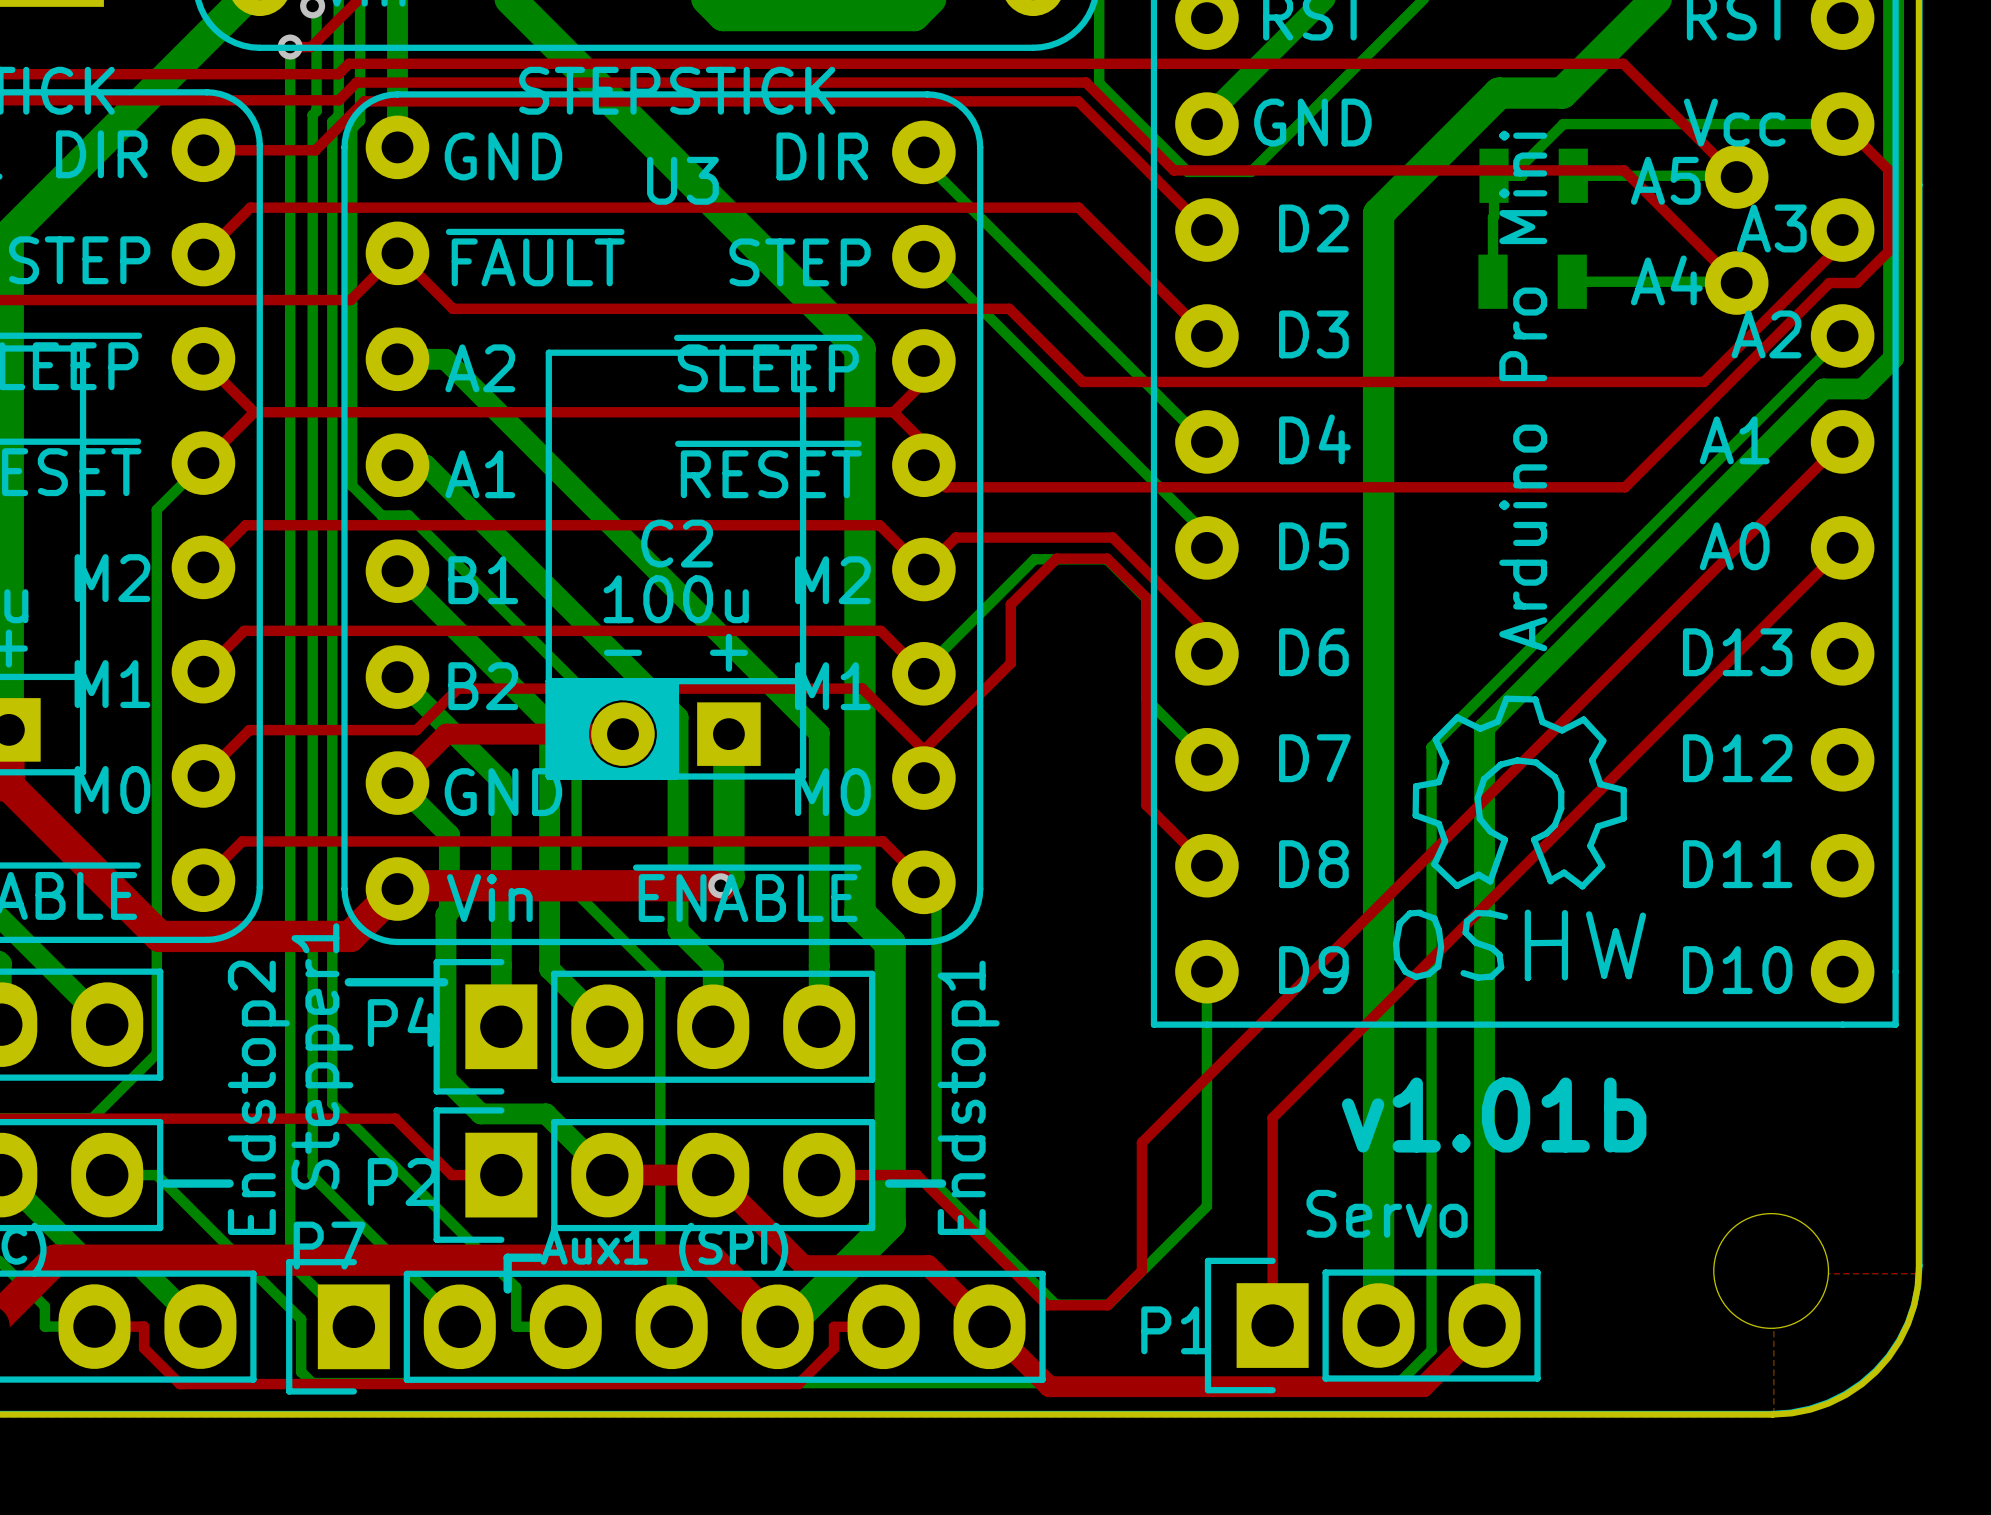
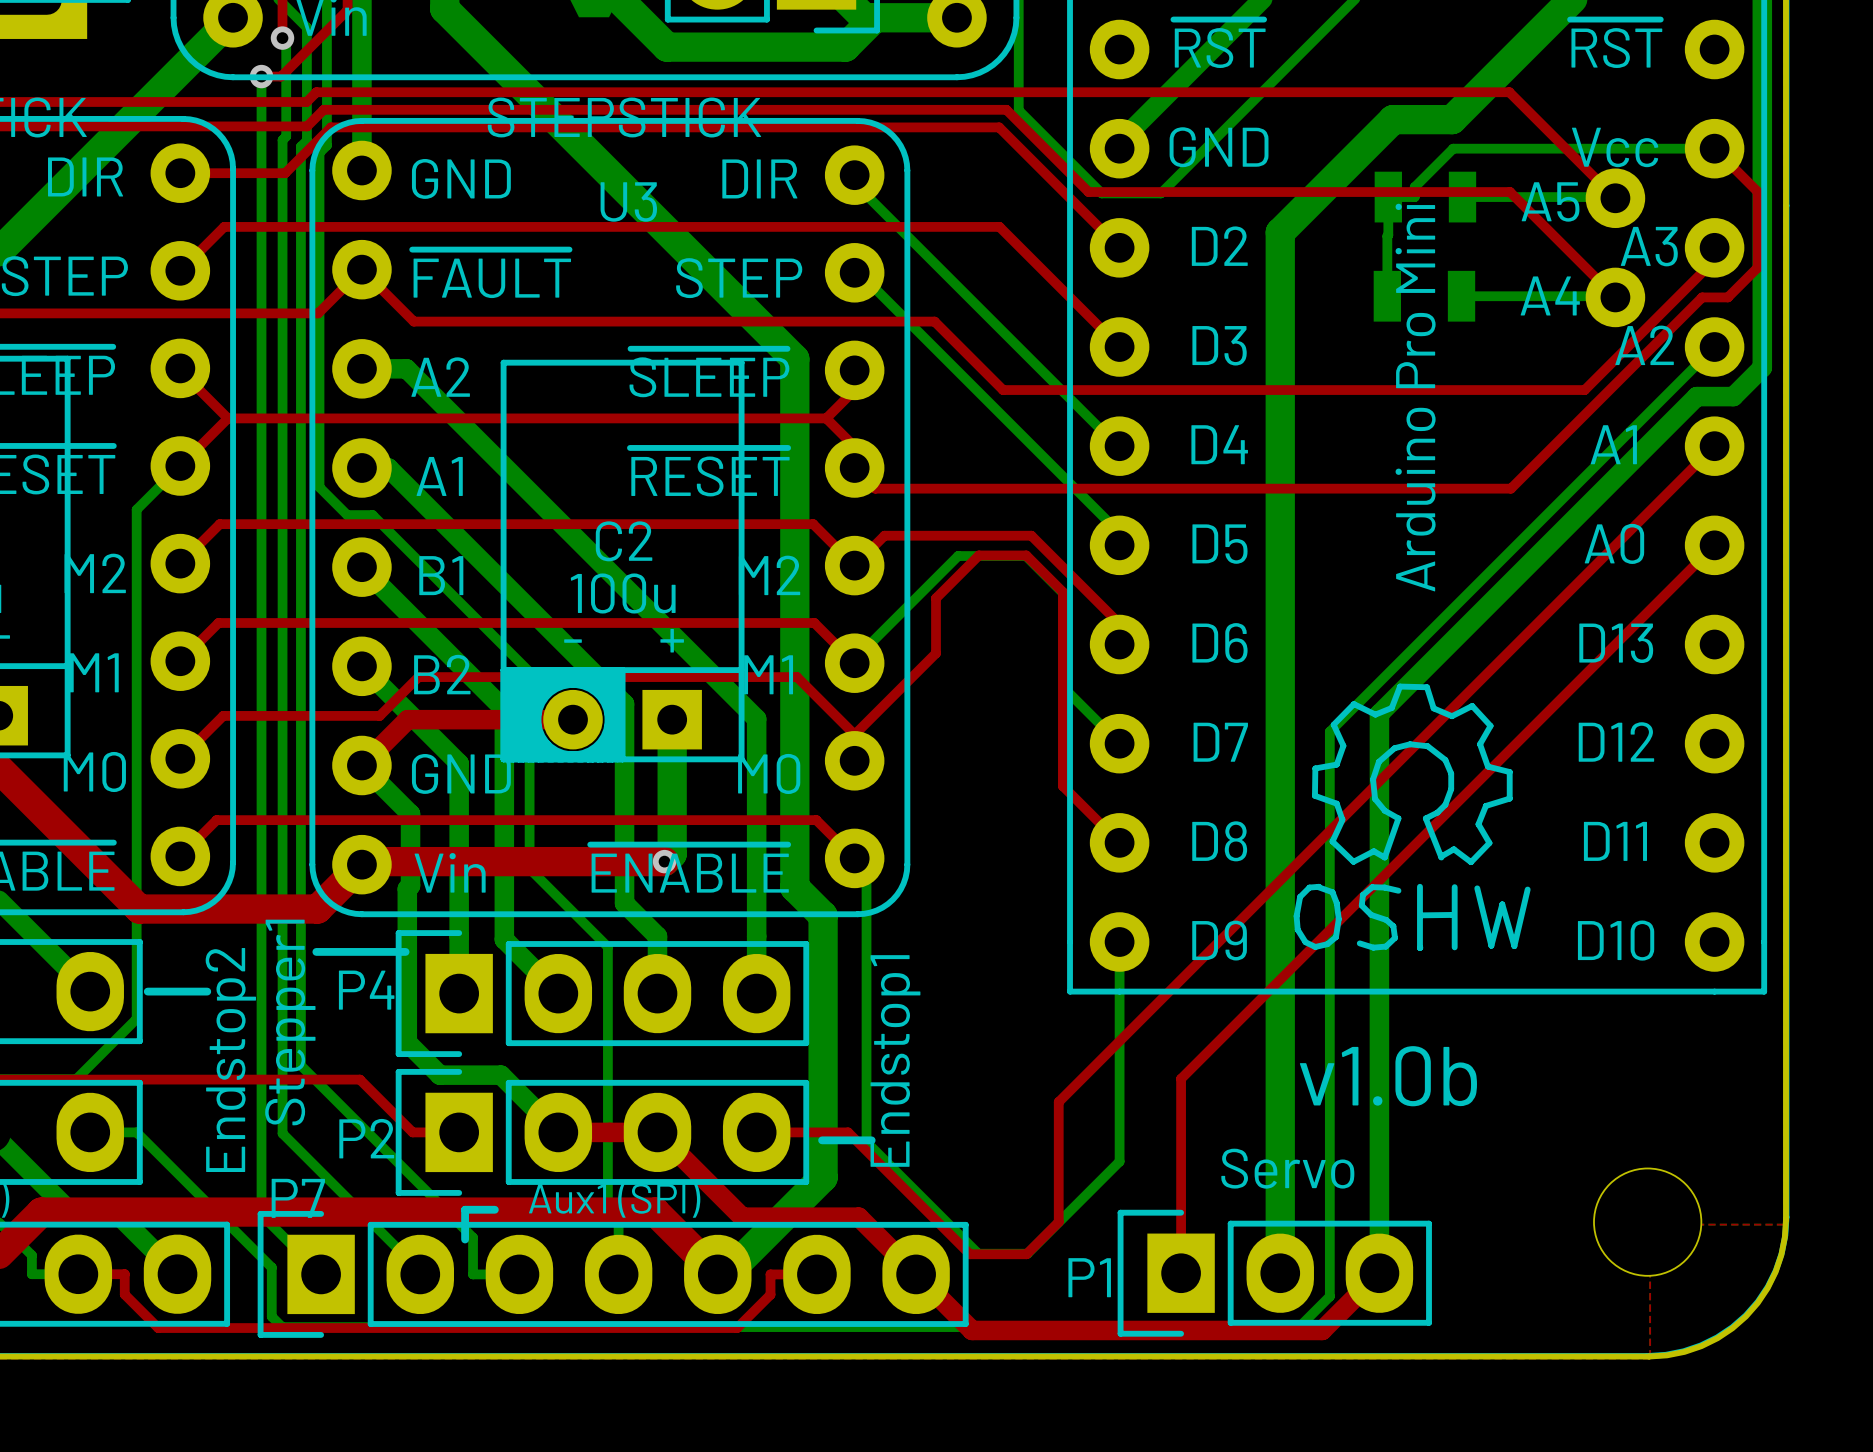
text: v1.01b (1494, 1115) -> v1.0b (1388, 1076)
line: (166, 1183) (229, 1183) -> (147, 991) (207, 991)

